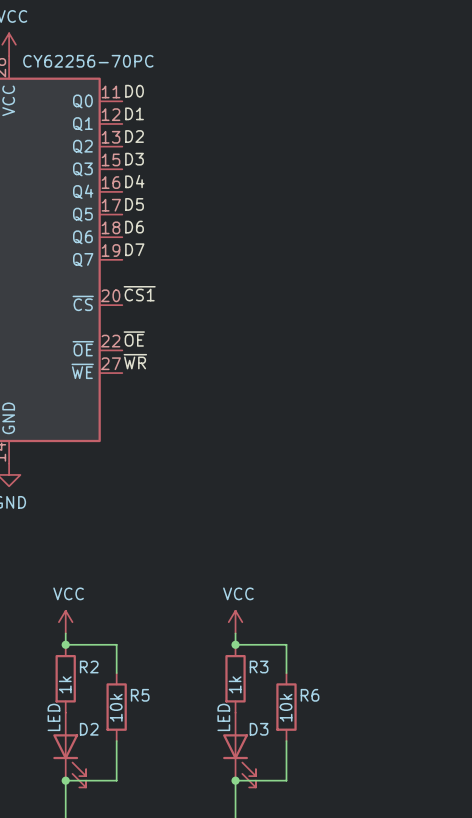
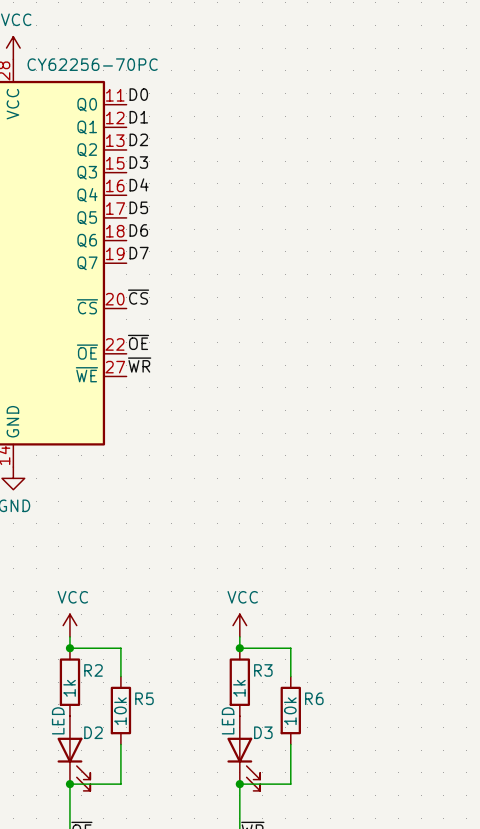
label: ~{CS1} (139, 293) -> ~{CS} (138, 297)

